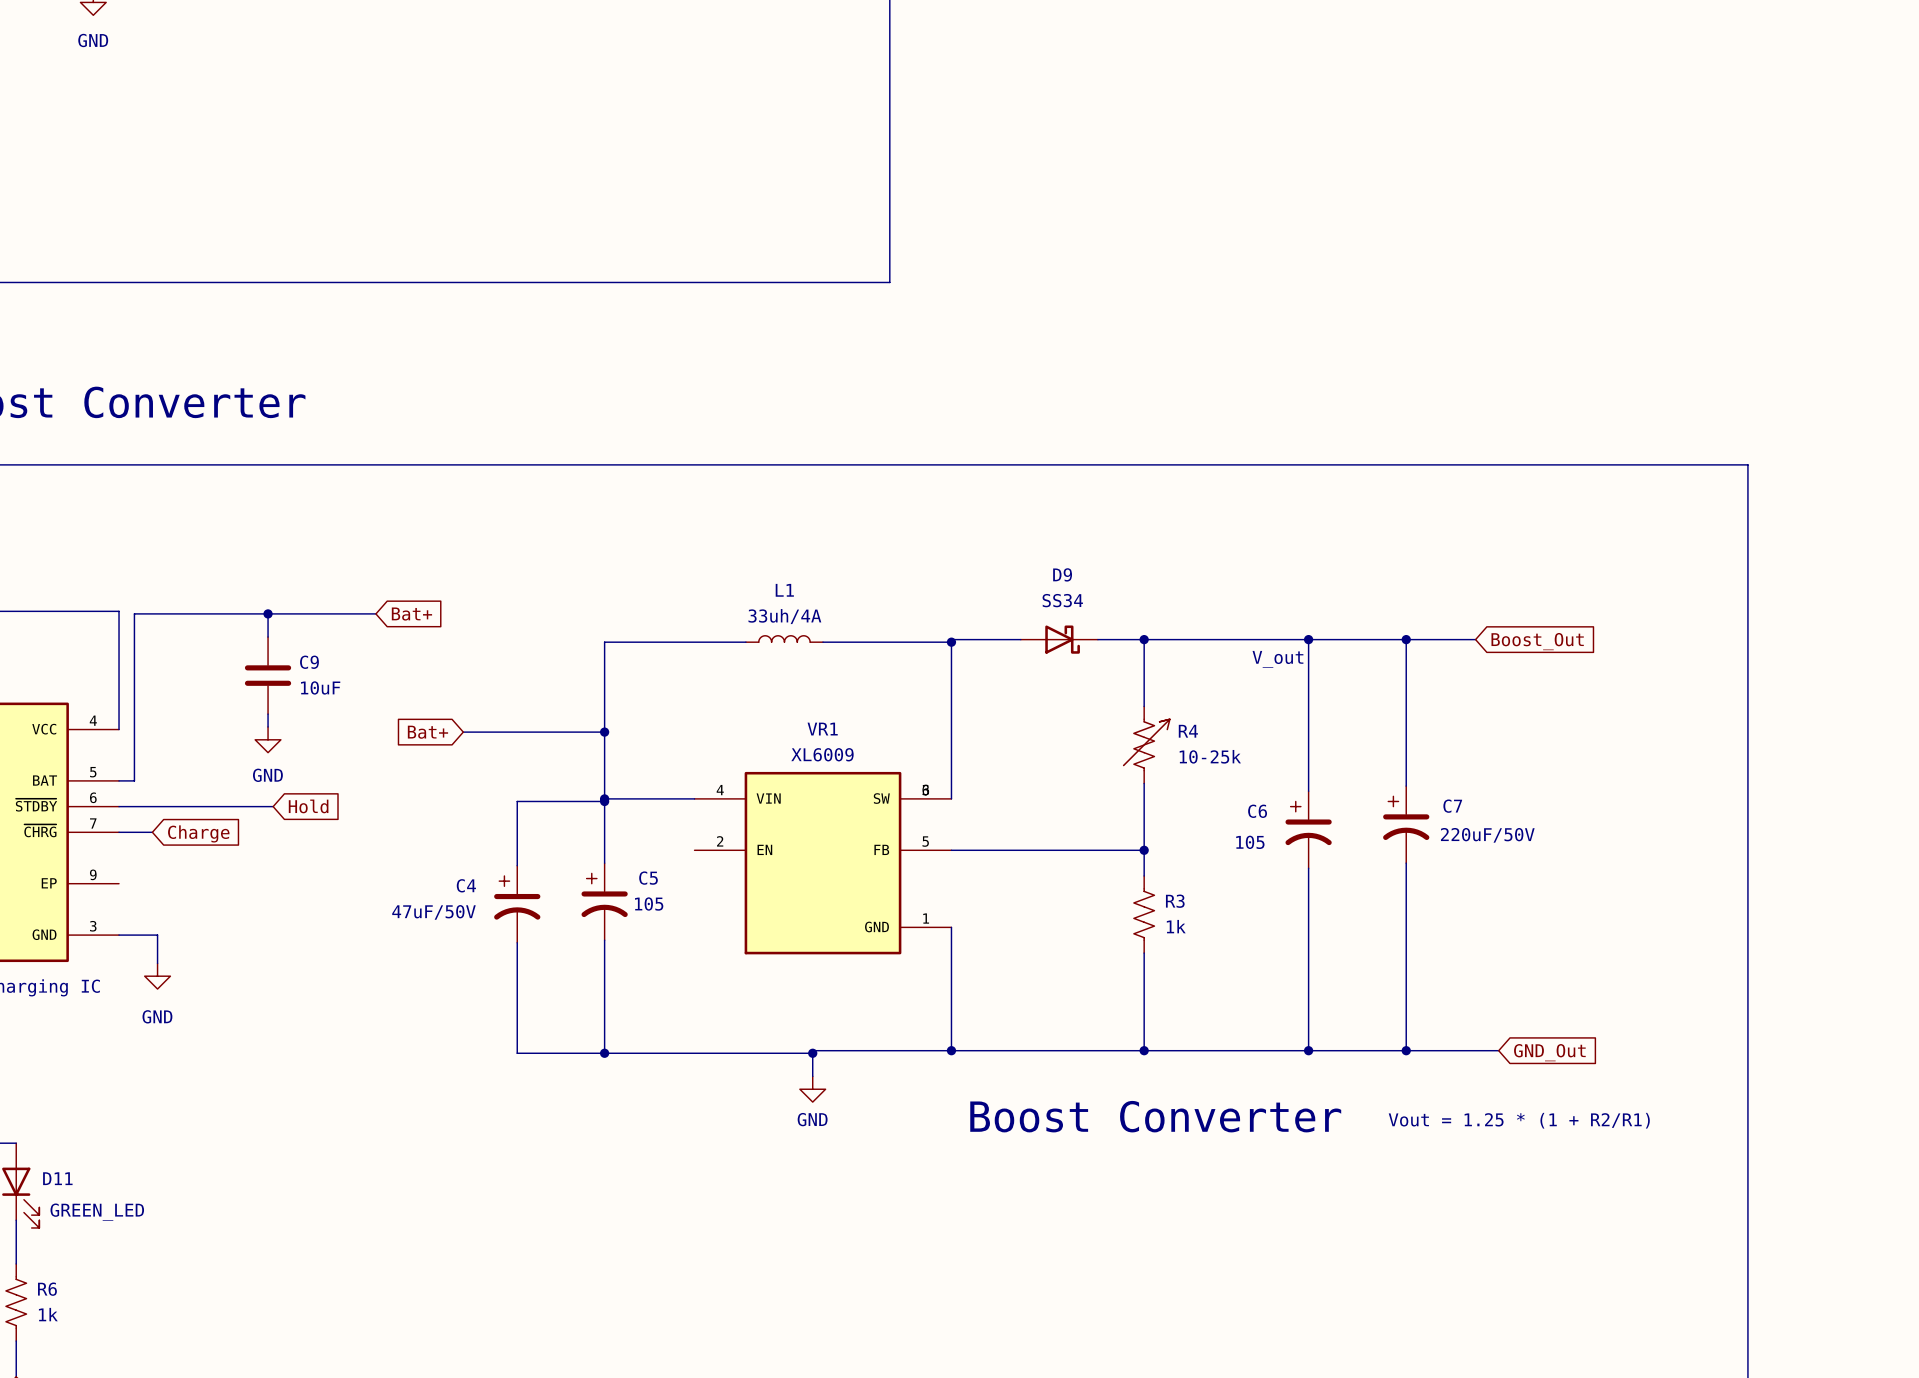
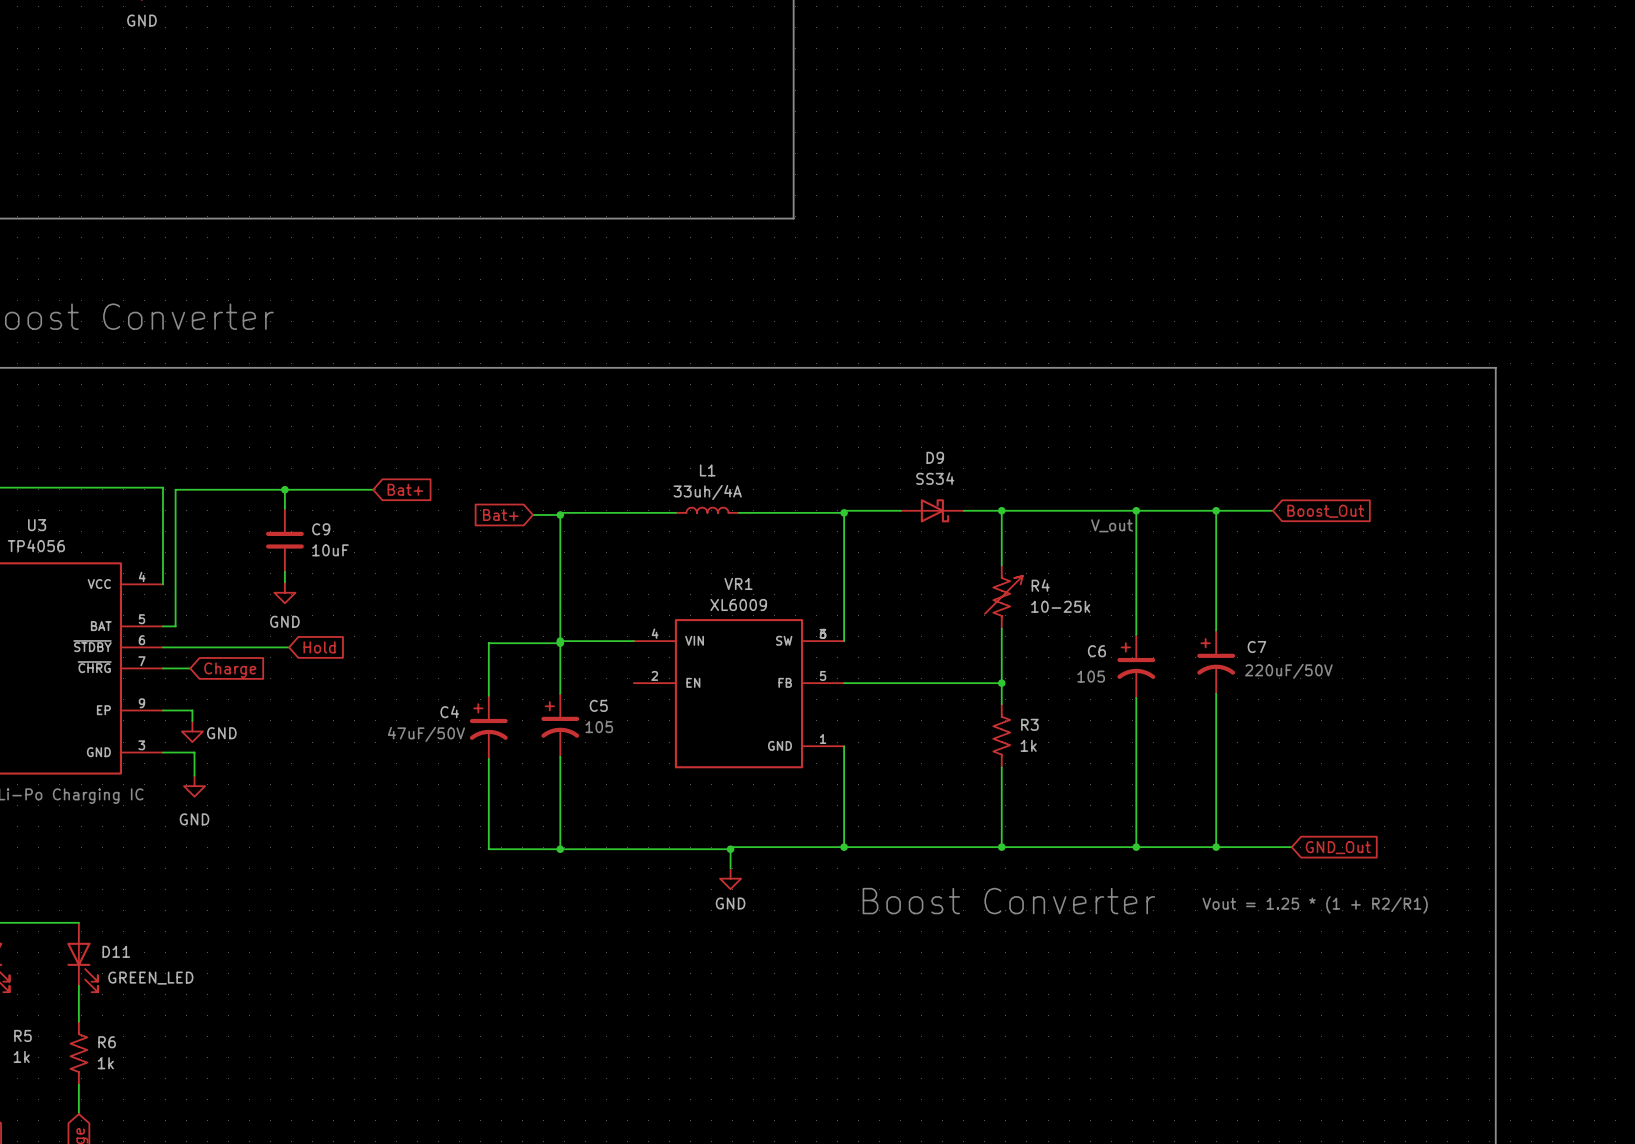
wire: none -> (532, 514) (560, 514)
junction: none -> (560, 514)
global label position: Bat+ (427, 732) -> Bat+ (500, 514)
wire: (463, 732) (604, 732) -> none
junction: (604, 732) -> none
wire: none -> (162, 710) (192, 710) (192, 720)
power symbol: none -> GND (192, 731)

